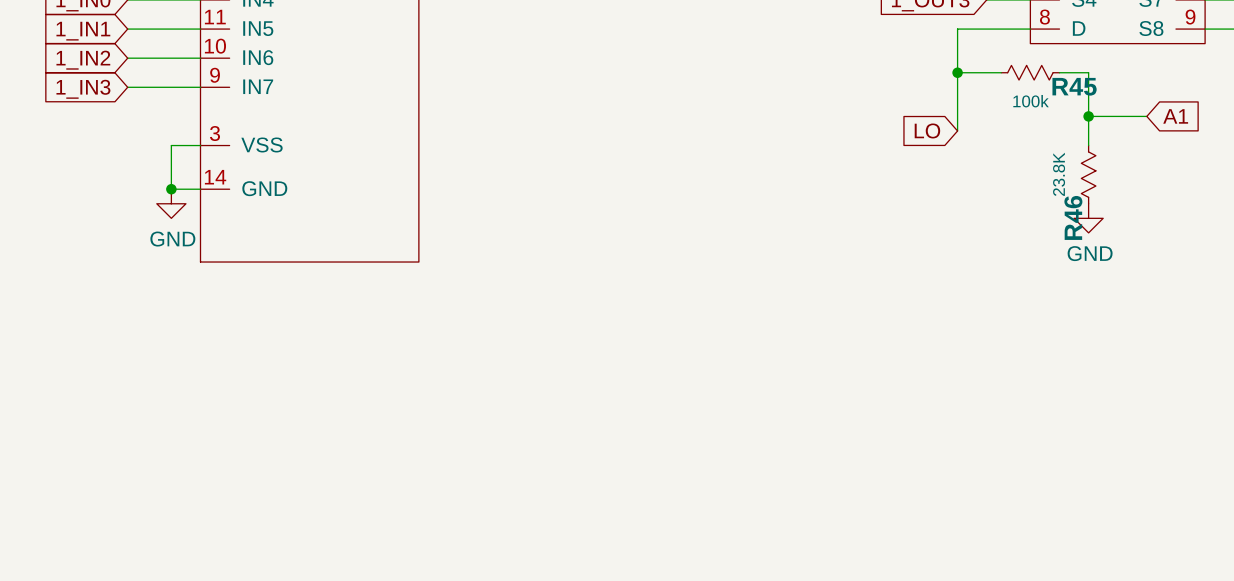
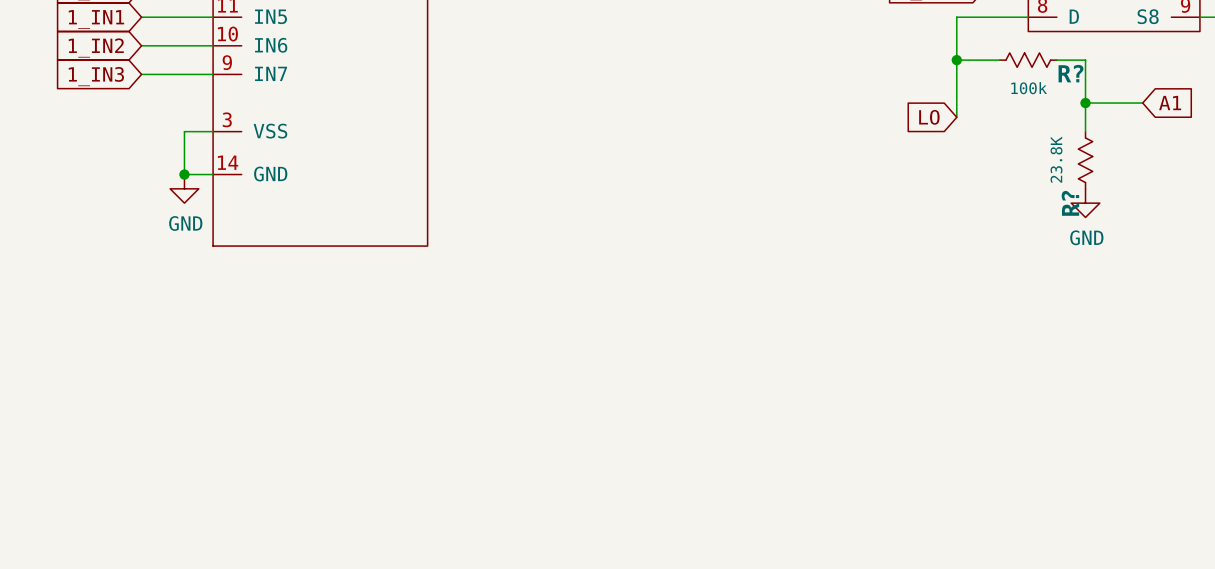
R45 name: R45 (1074, 86) -> R? (1071, 73)
R46 name: R46 (1073, 217) -> R? (1070, 203)

